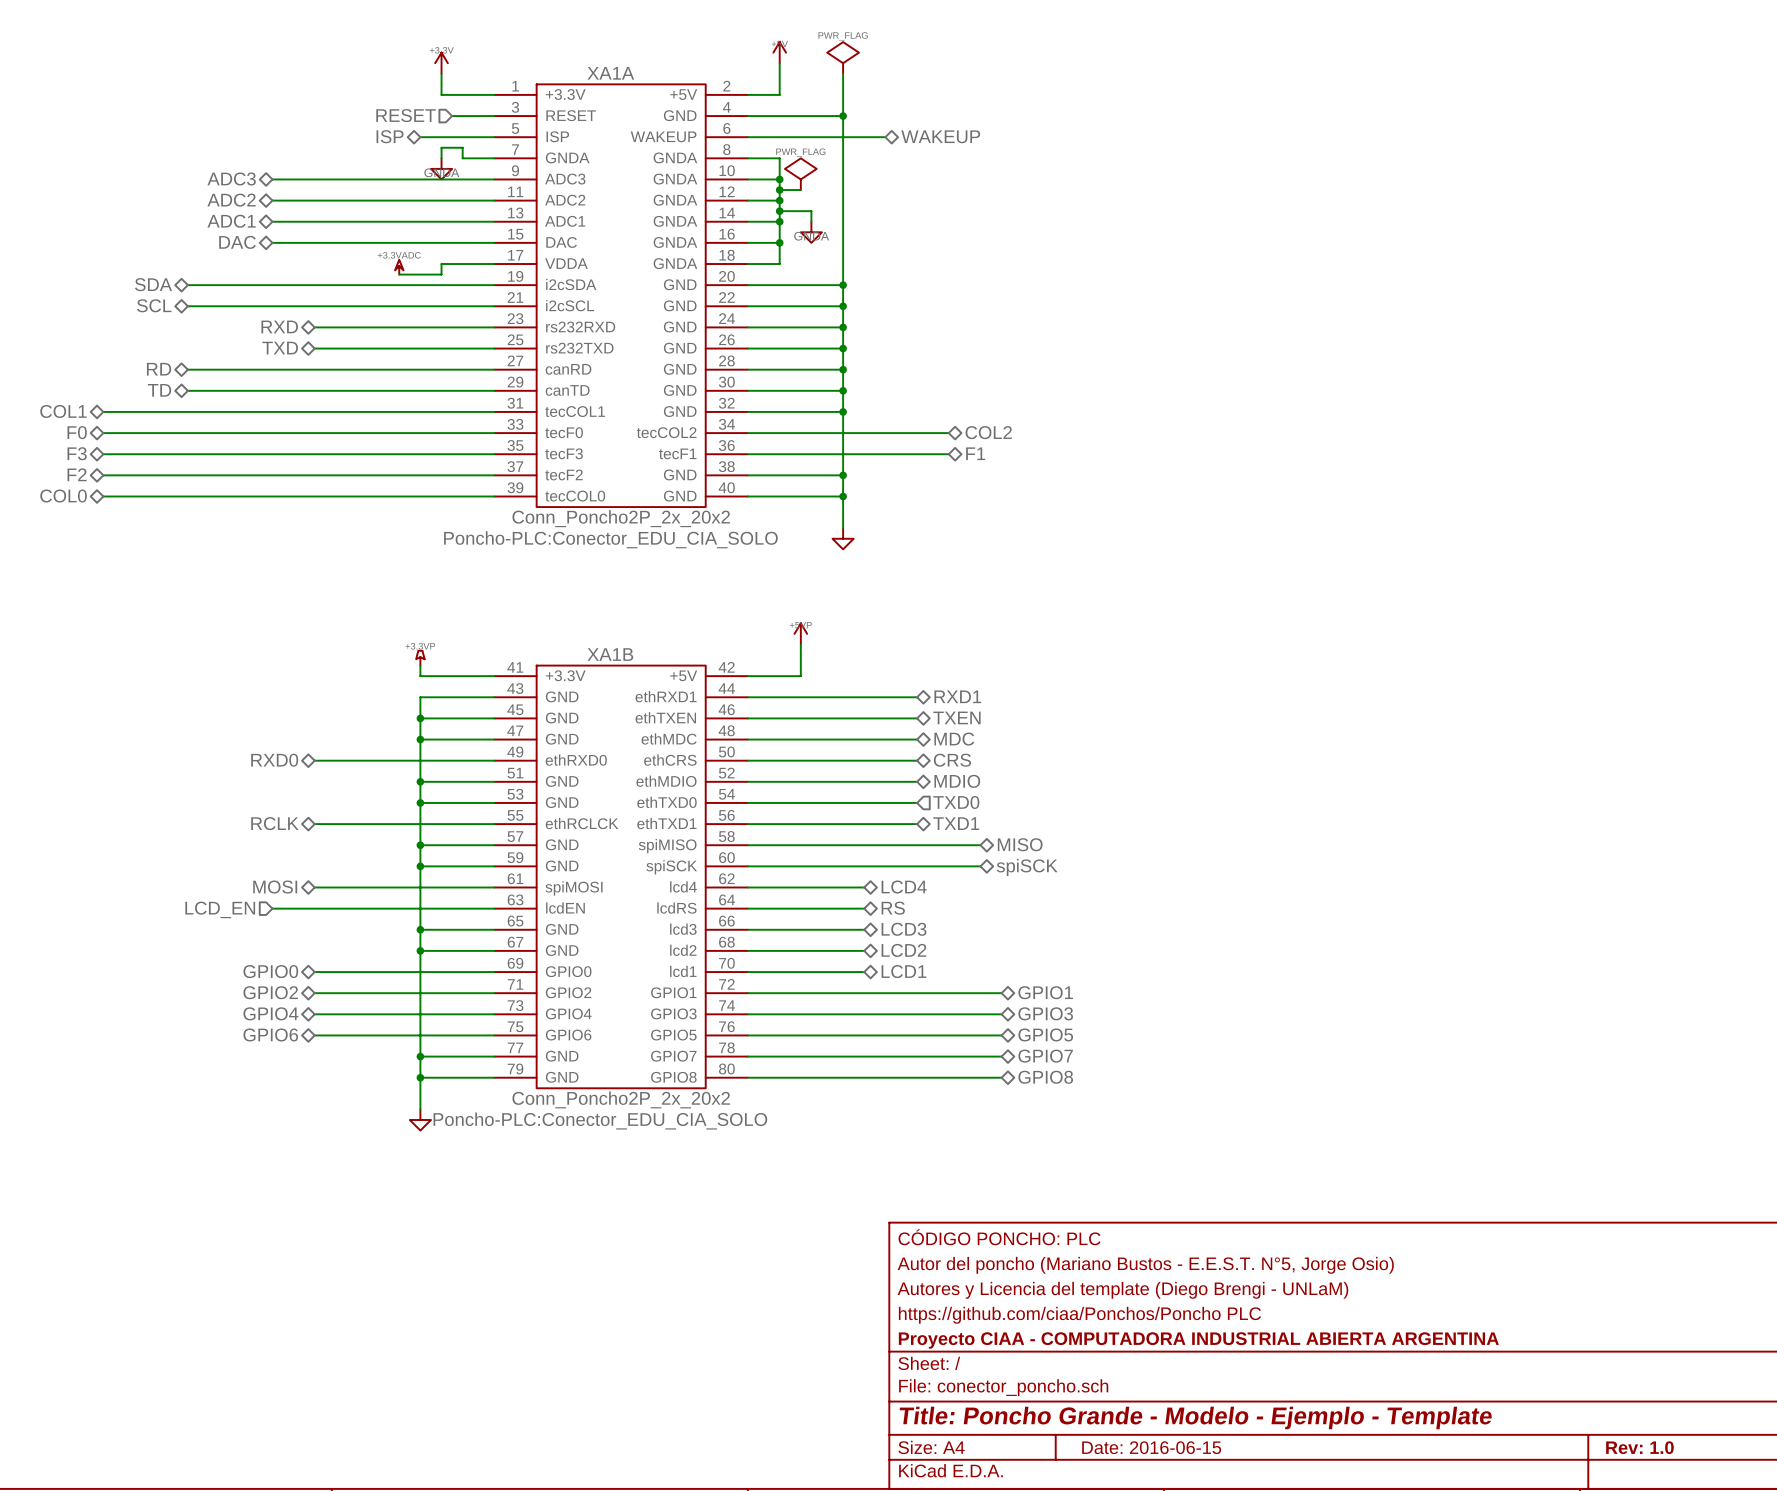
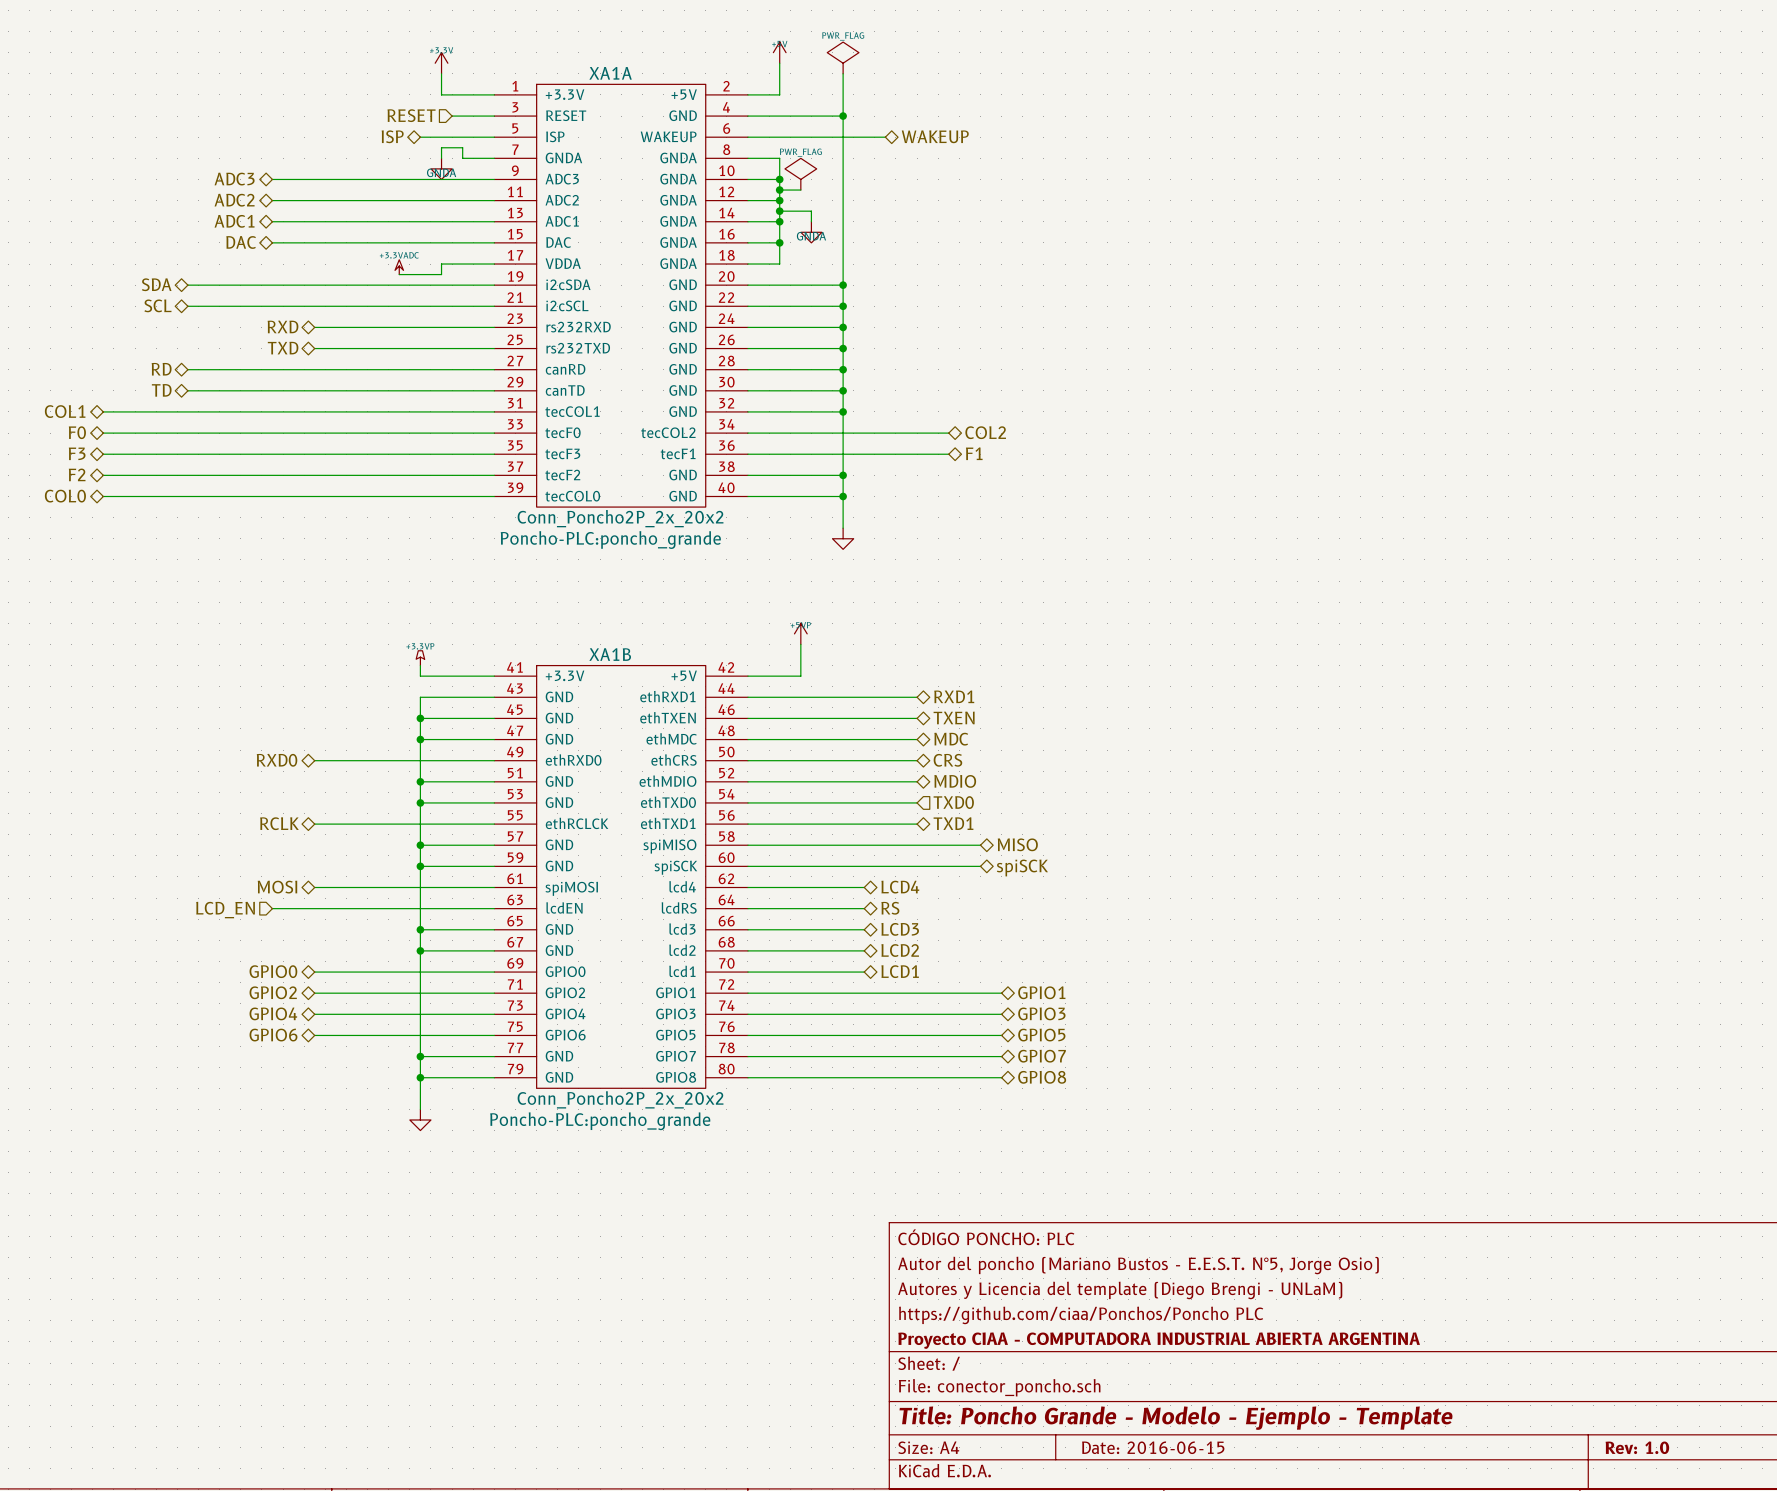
XA1A text: Poncho-PLC:Conector_EDU_CIA_SOLO (610, 539) -> Poncho-PLC:poncho_grande (610, 540)
XA1B text: Poncho-PLC:Conector_EDU_CIA_SOLO (600, 1121) -> Poncho-PLC:poncho_grande (600, 1121)

